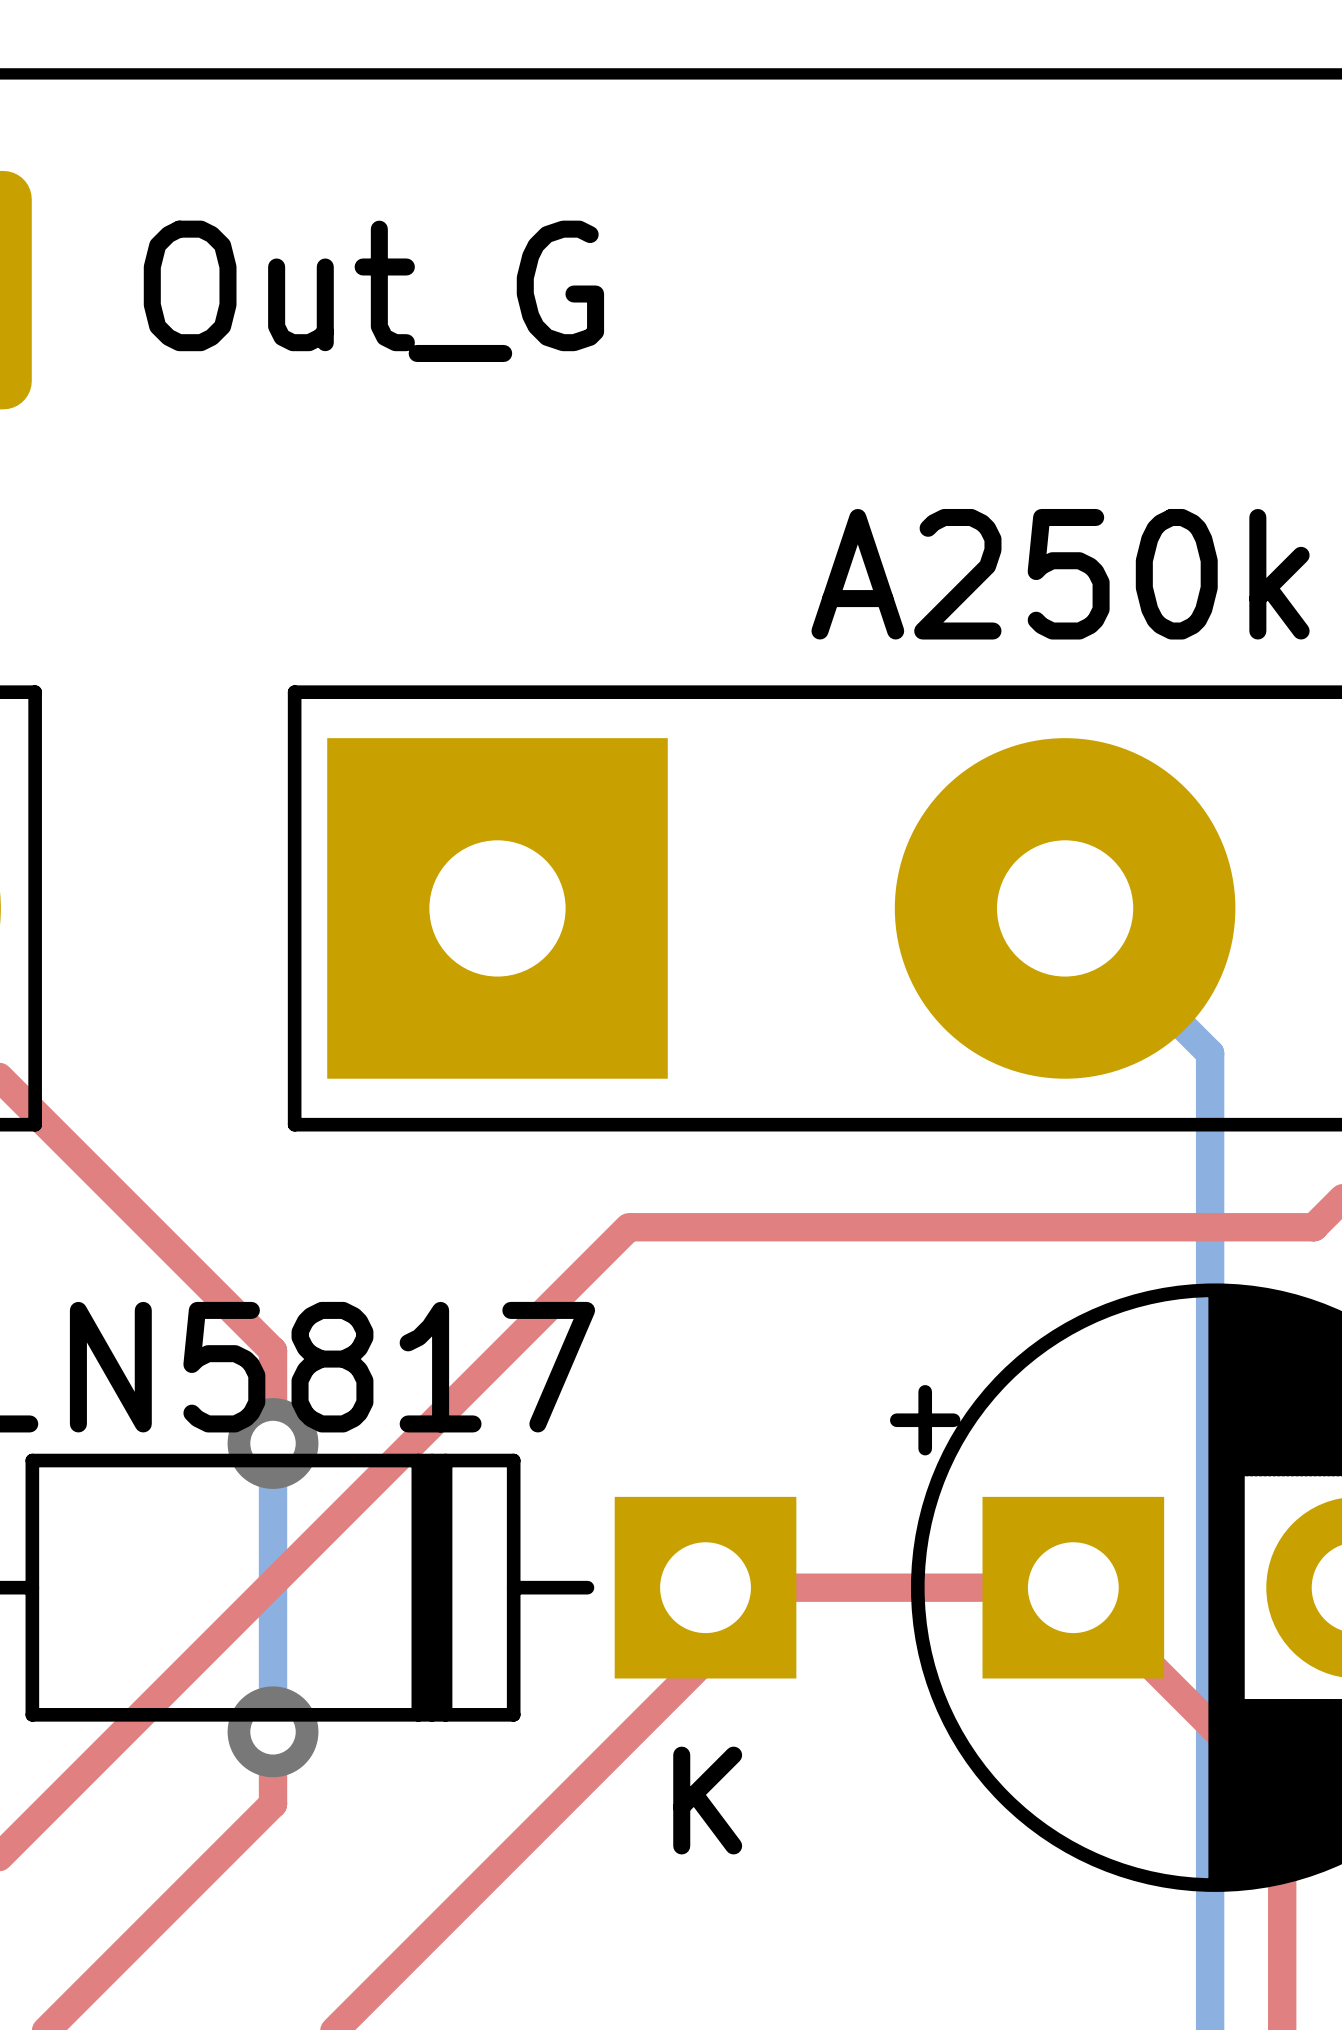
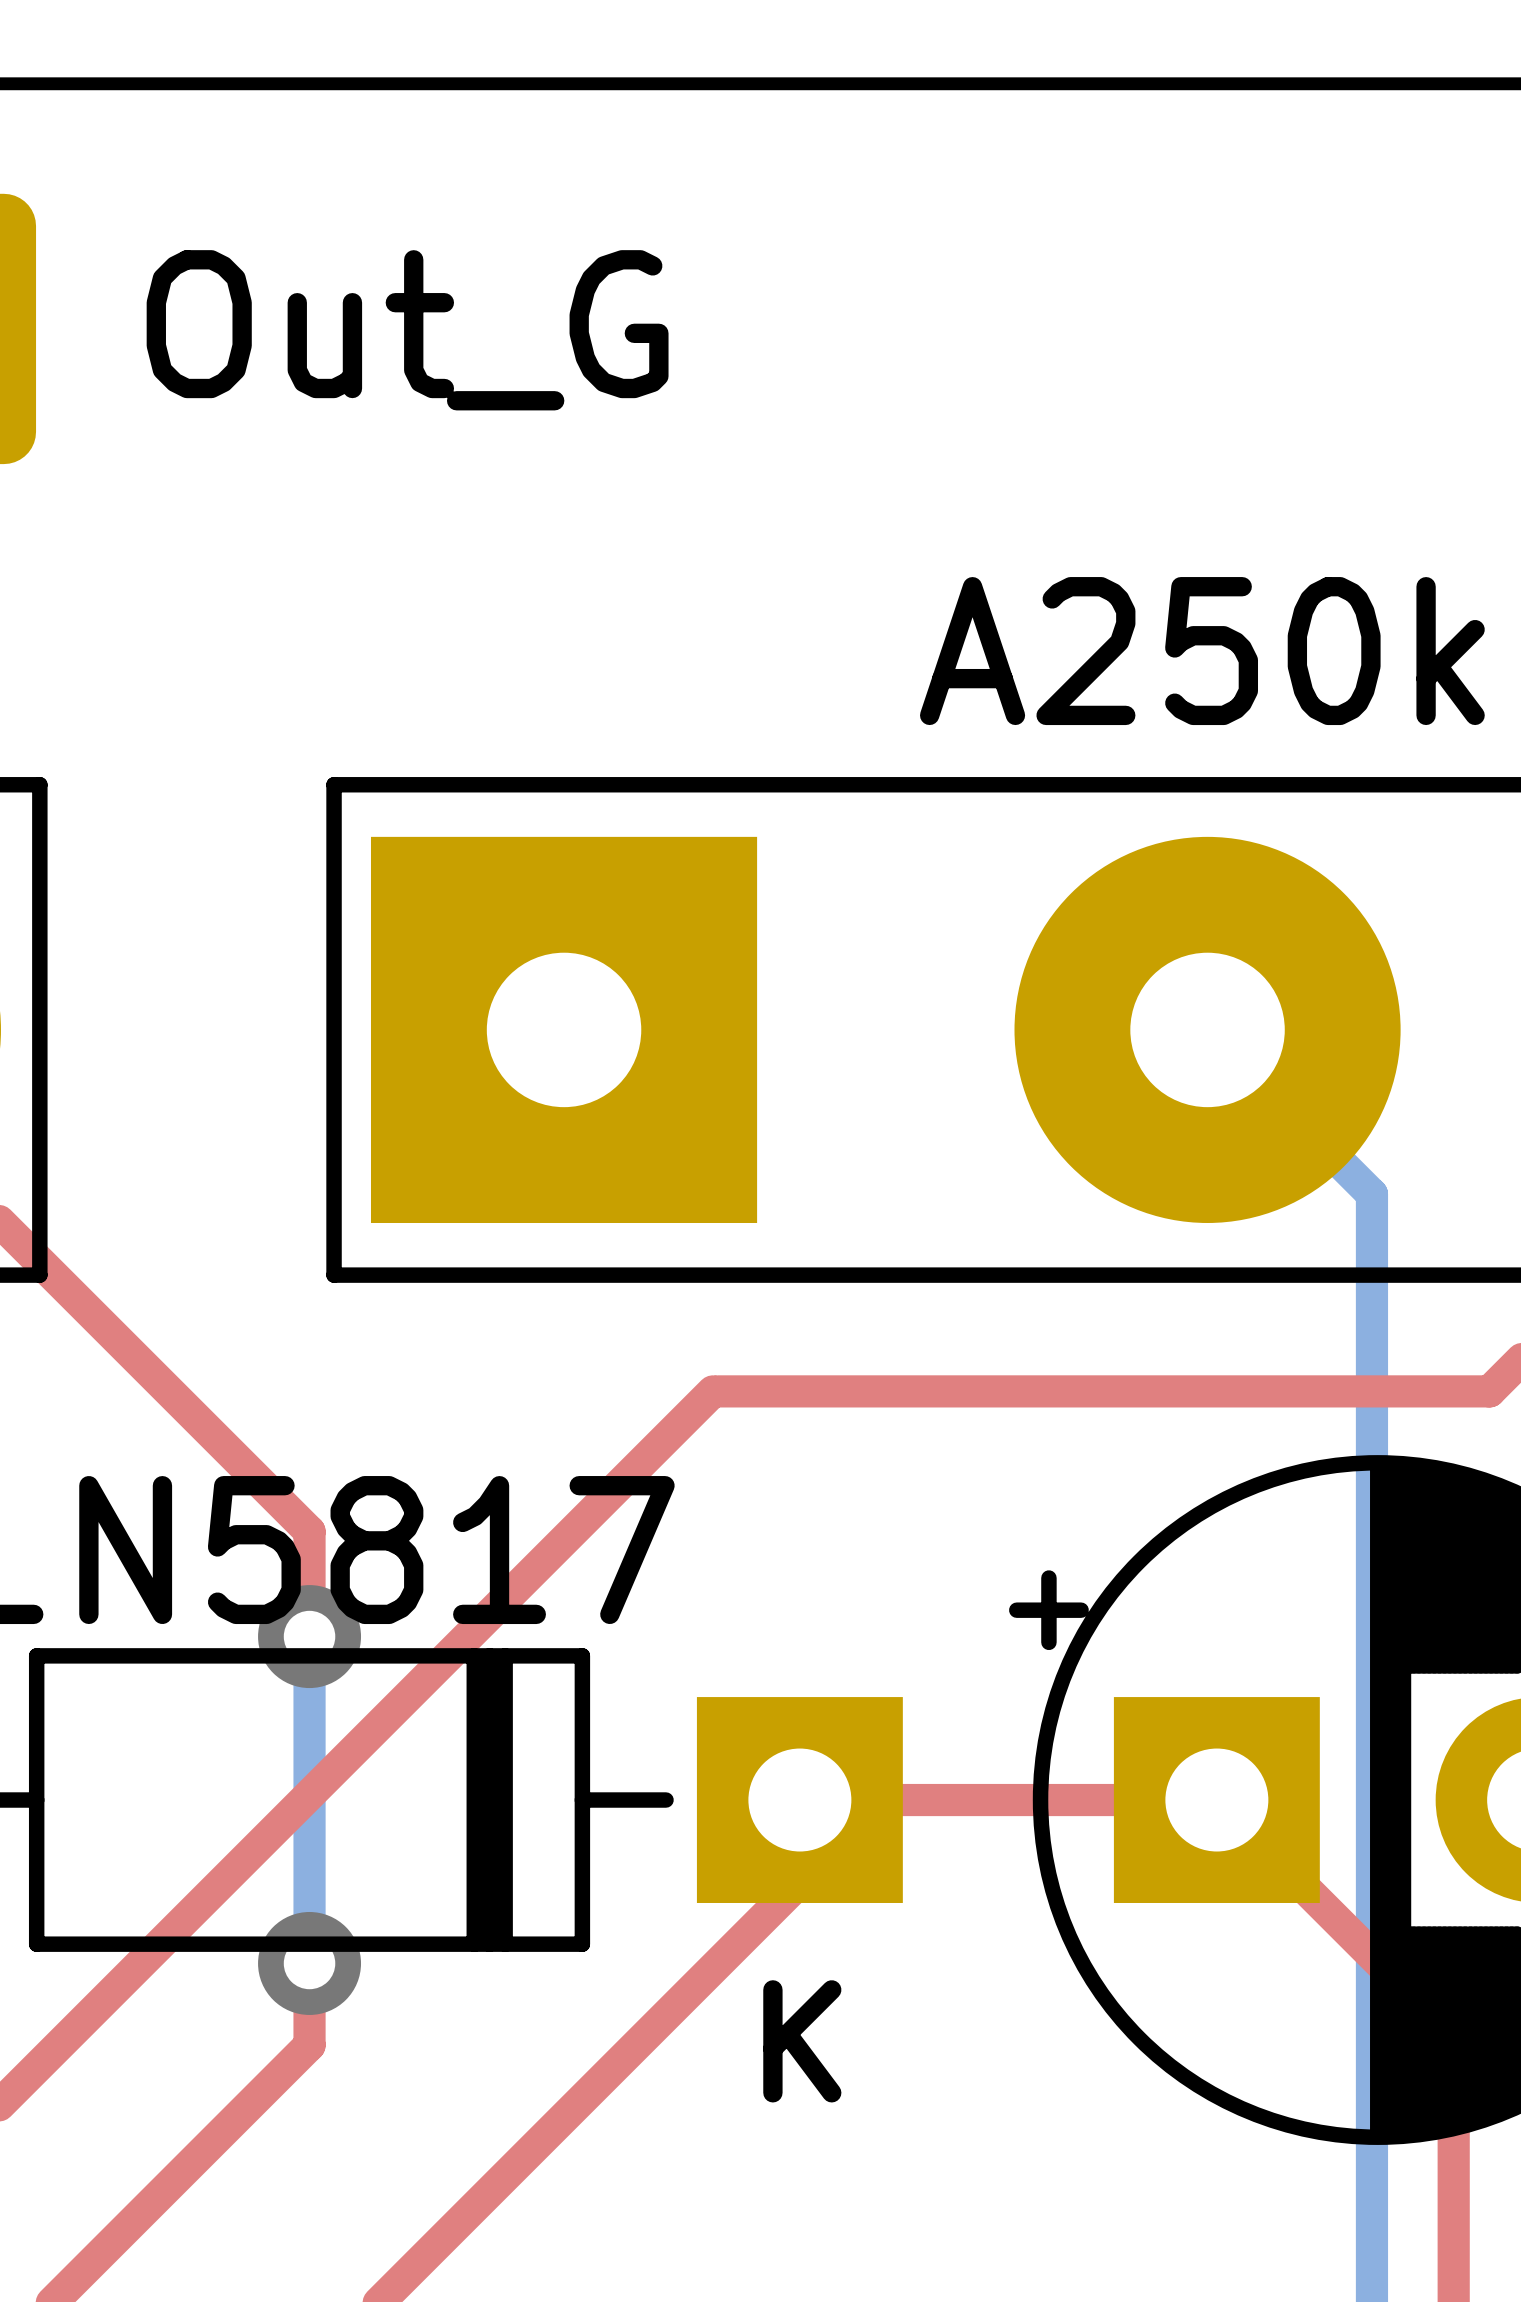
part value position: Out_G (373, 291) -> Out_G (407, 330)

